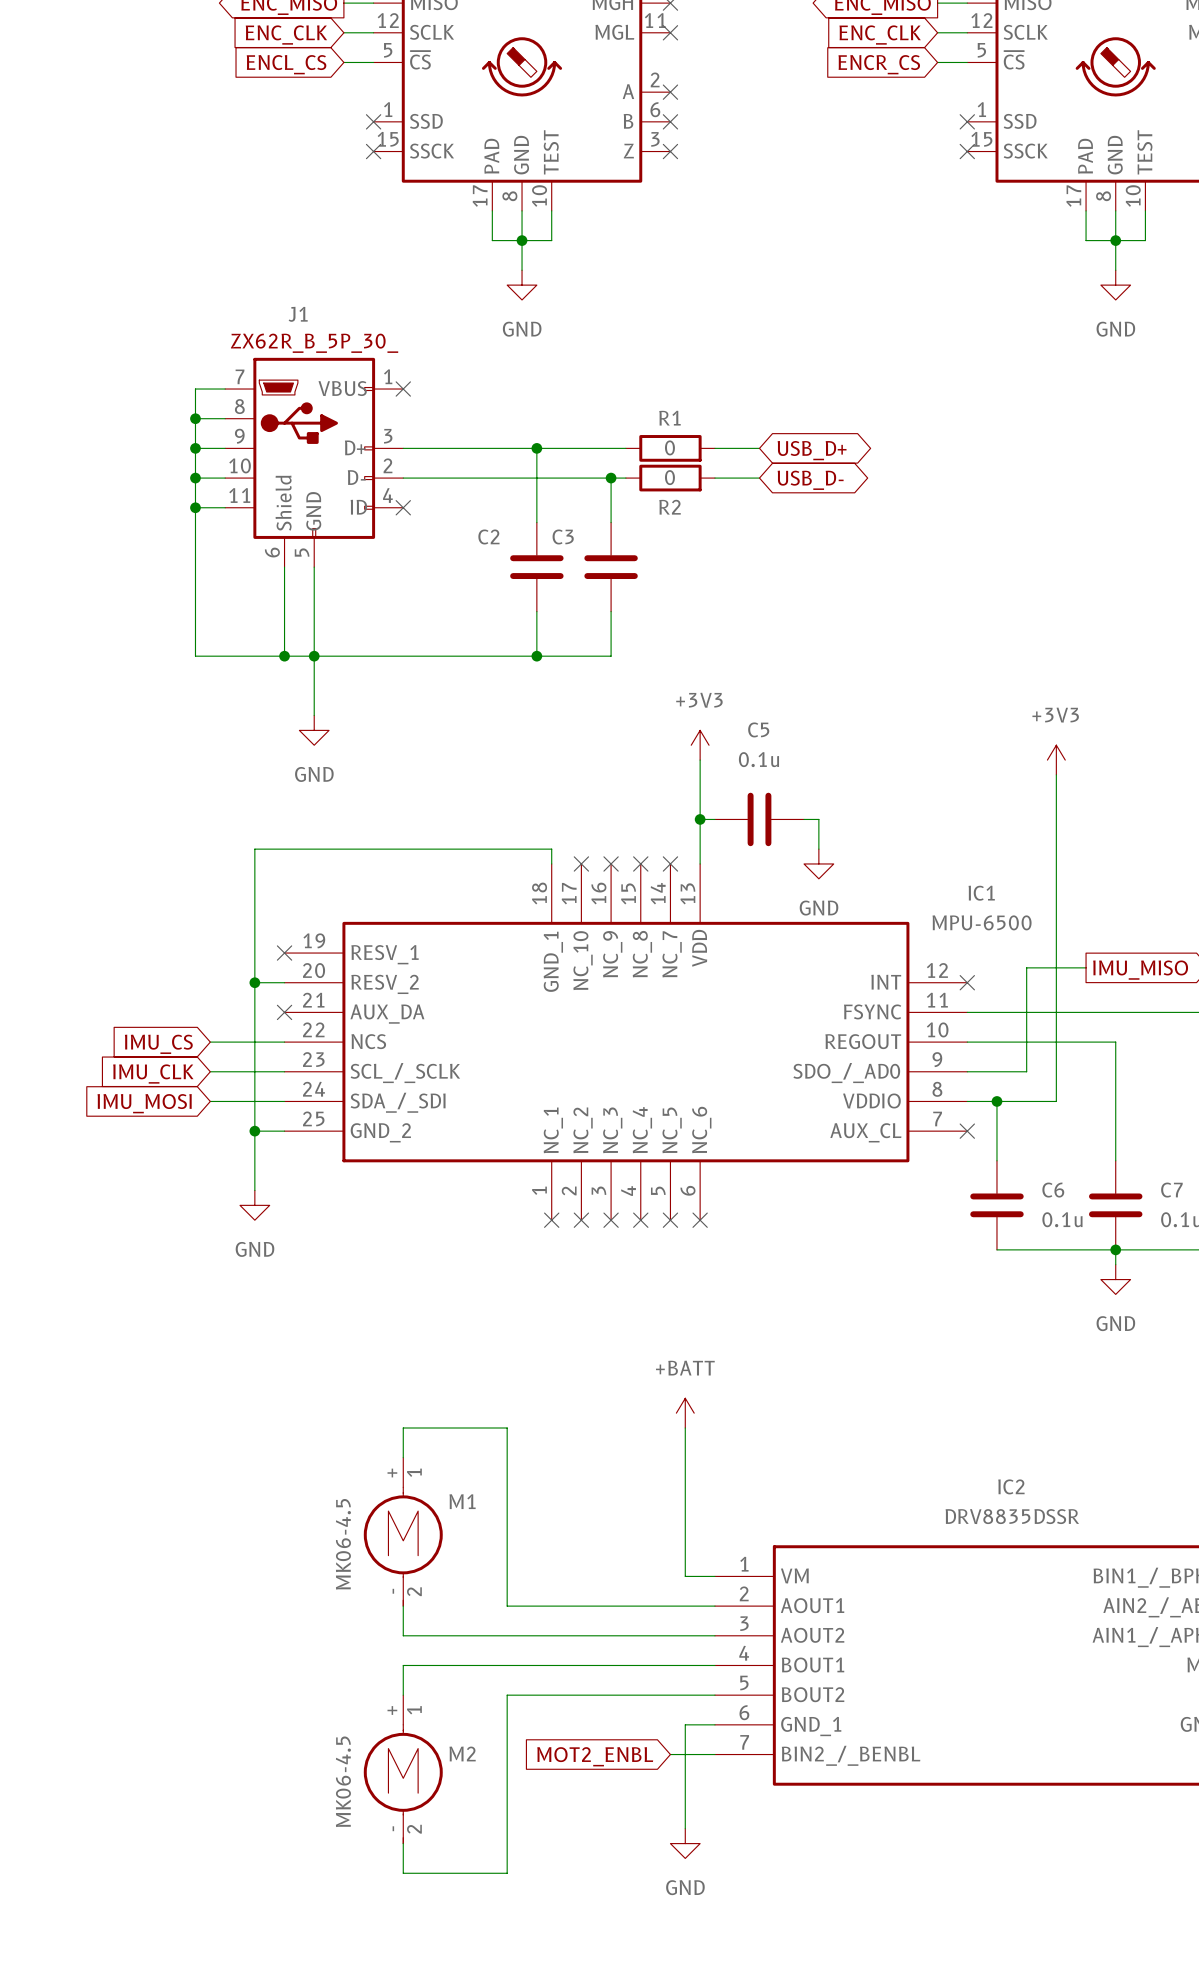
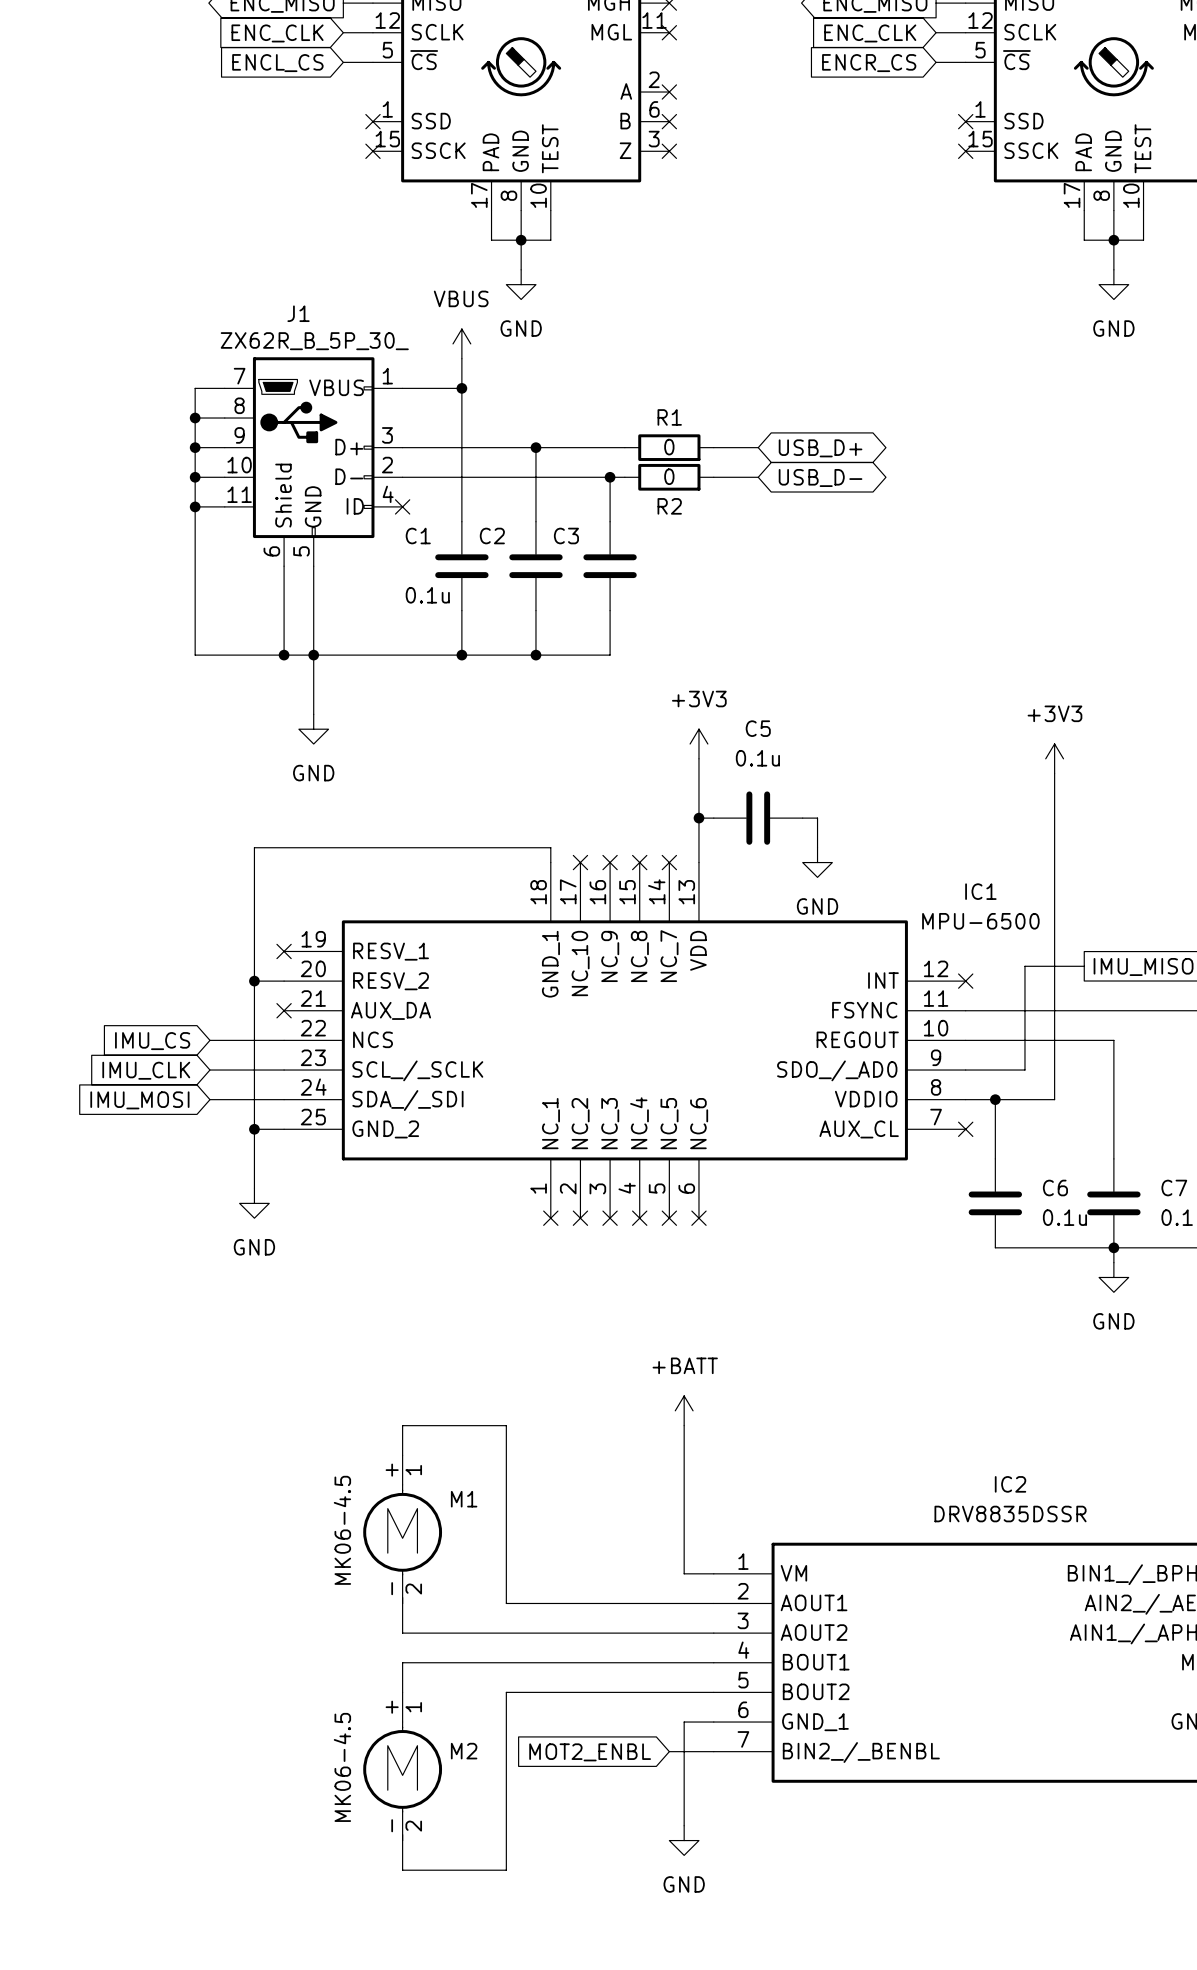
power symbol: none -> VBUS (461, 343)
wire: none -> (461, 358) (461, 521)
wire: none -> (402, 388) (461, 388)
no-connect mark: (403, 389) -> none
junction: none -> (461, 388)
C1: none -> 0.1u (461, 566)
wire: none -> (461, 610) (461, 655)
junction: none -> (461, 655)

